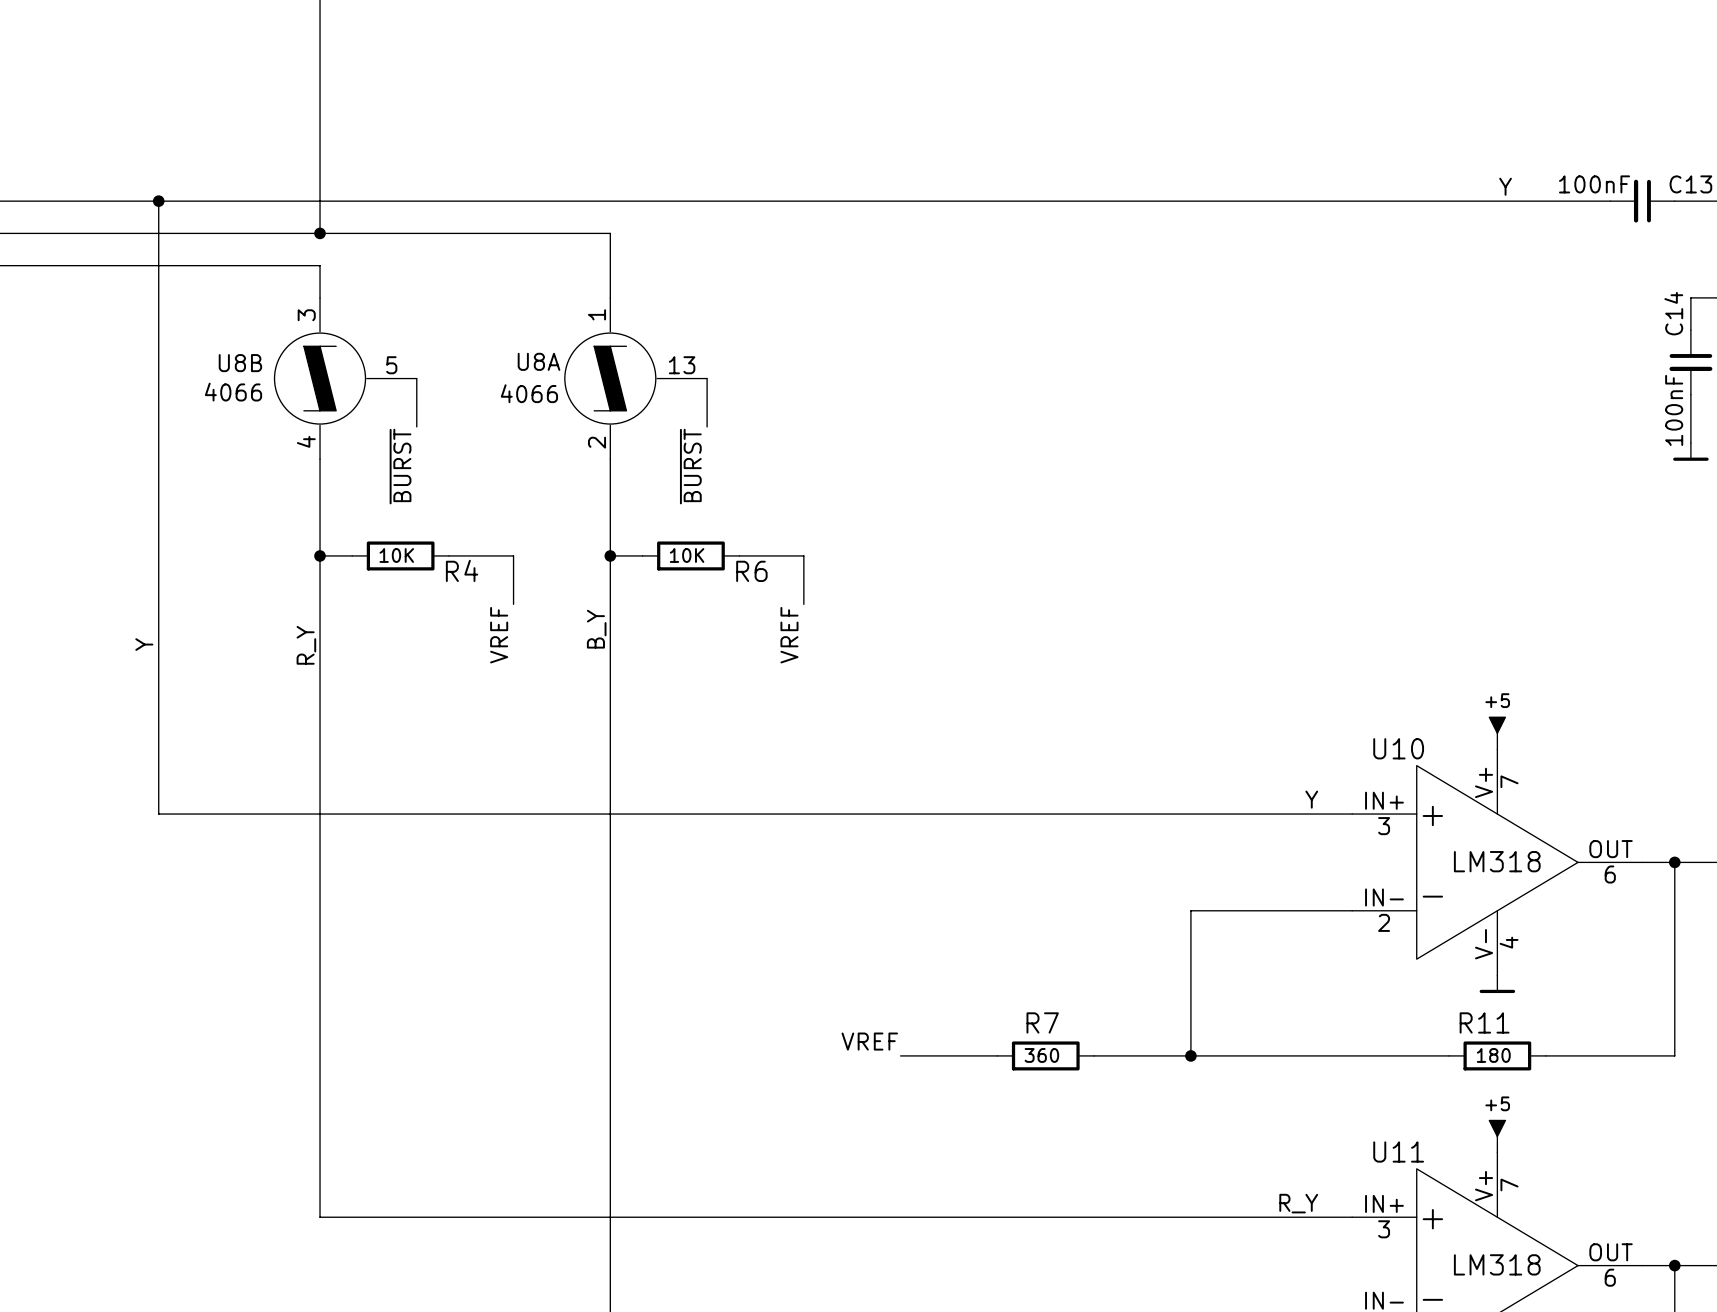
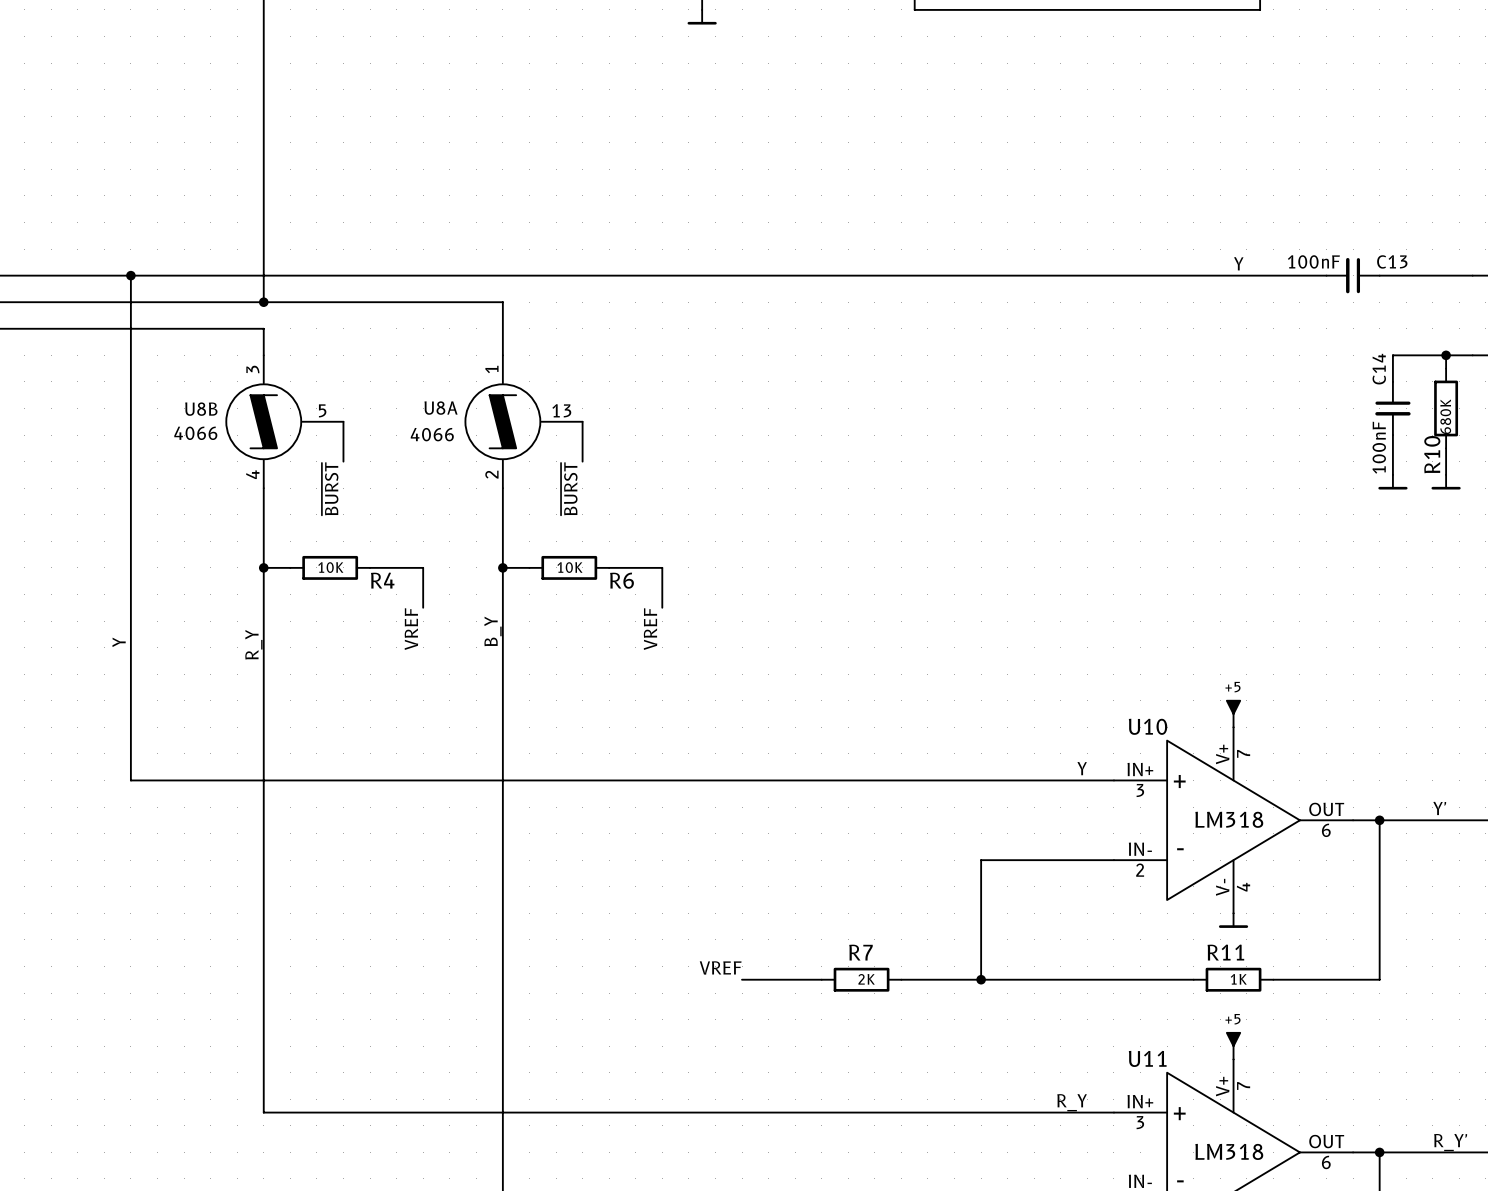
R7 value: 360 (1041, 1055) -> 2K (866, 979)
R11 value: 180 (1493, 1055) -> 1K (1238, 979)

